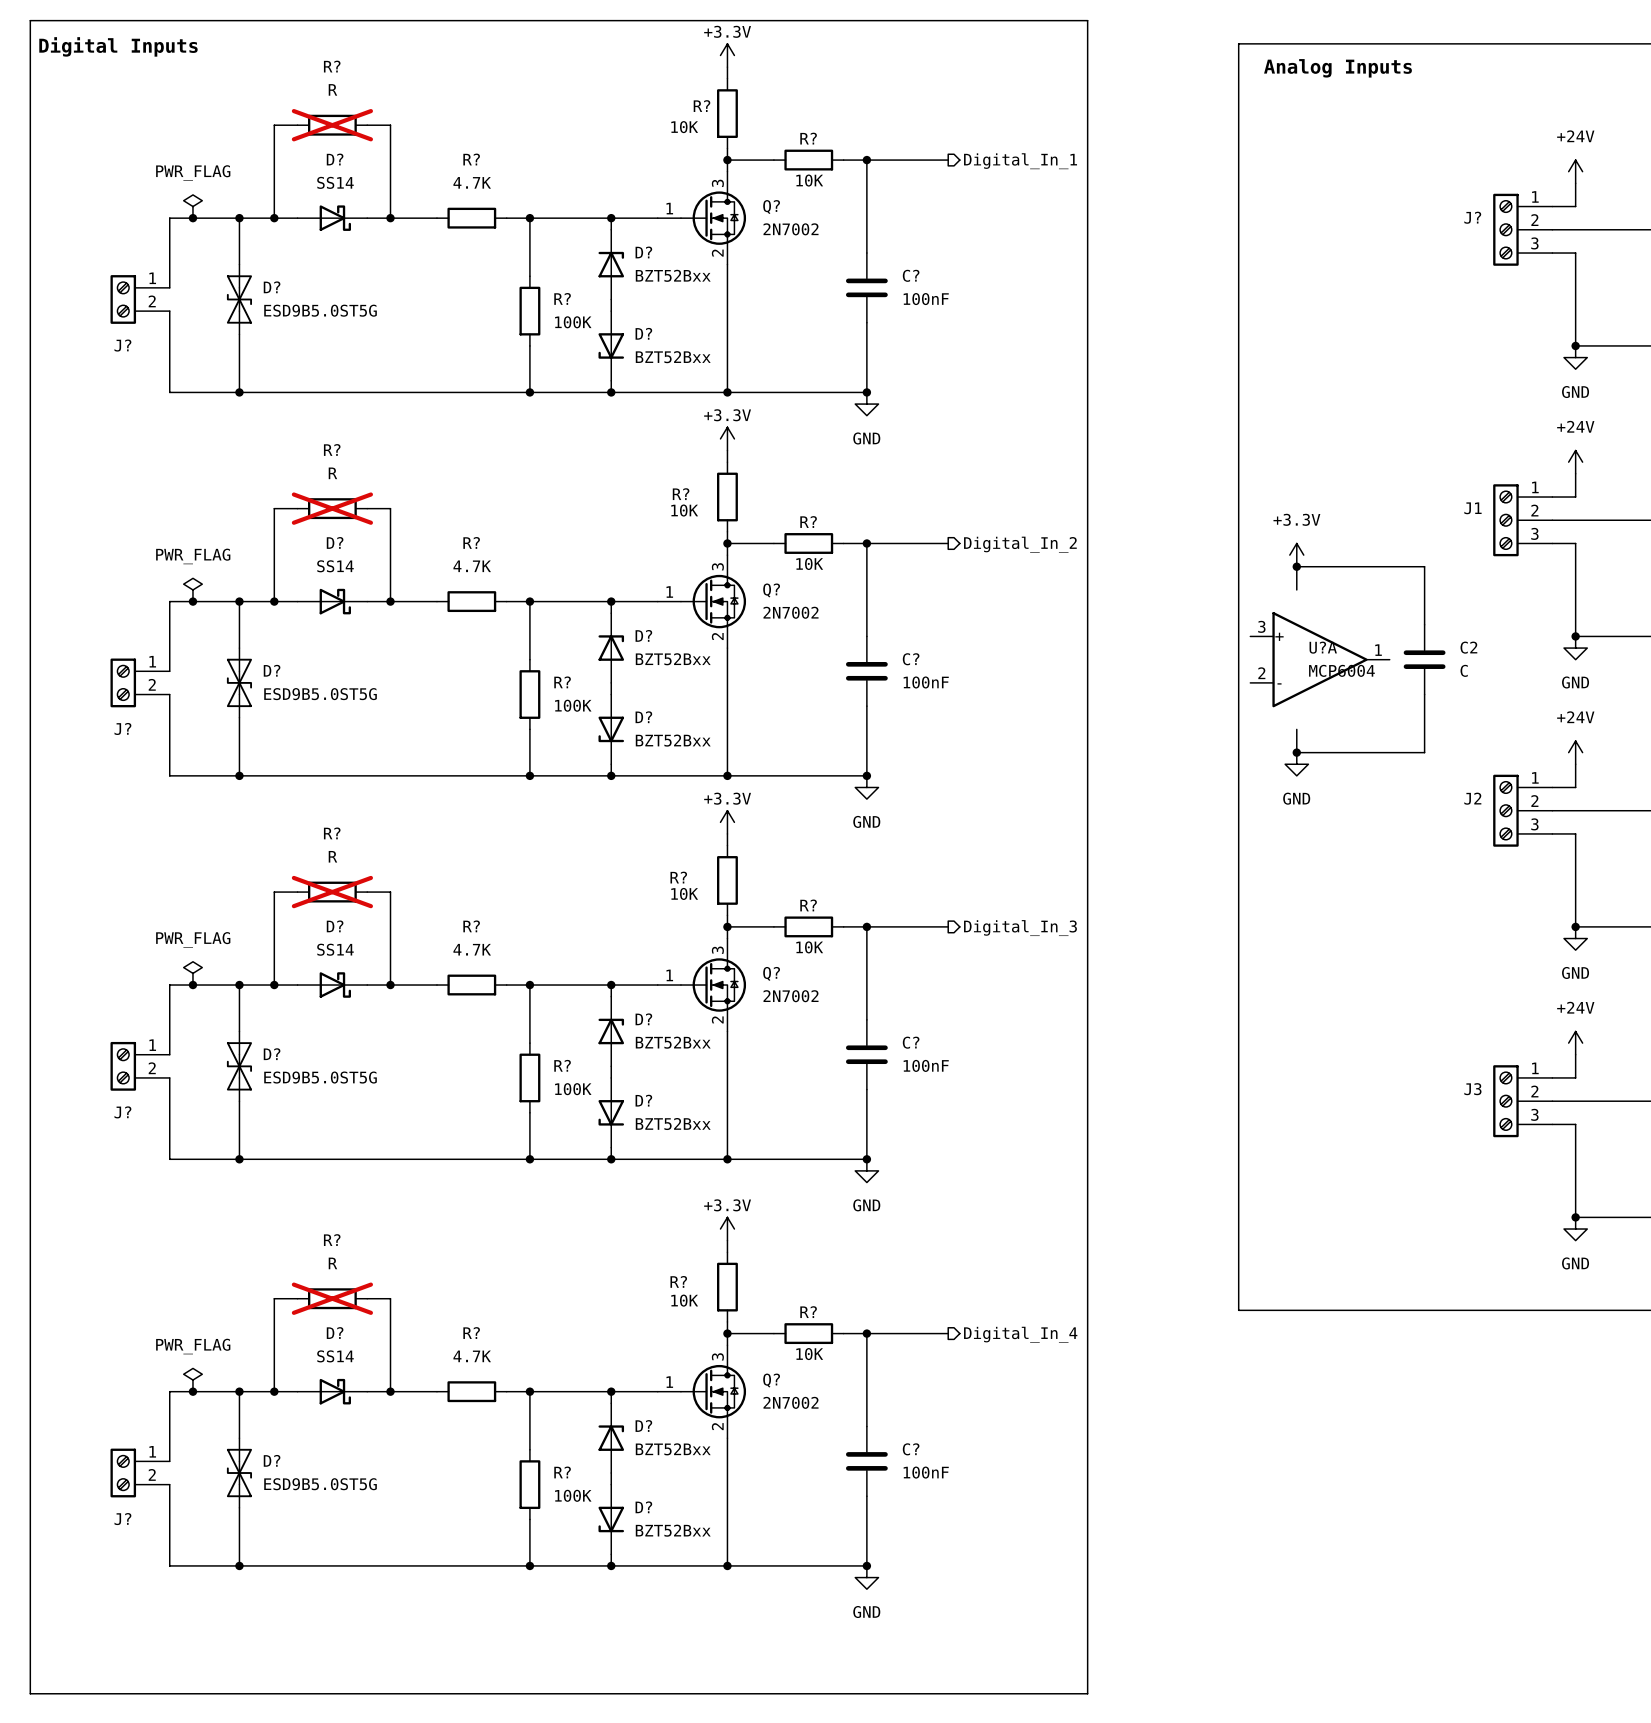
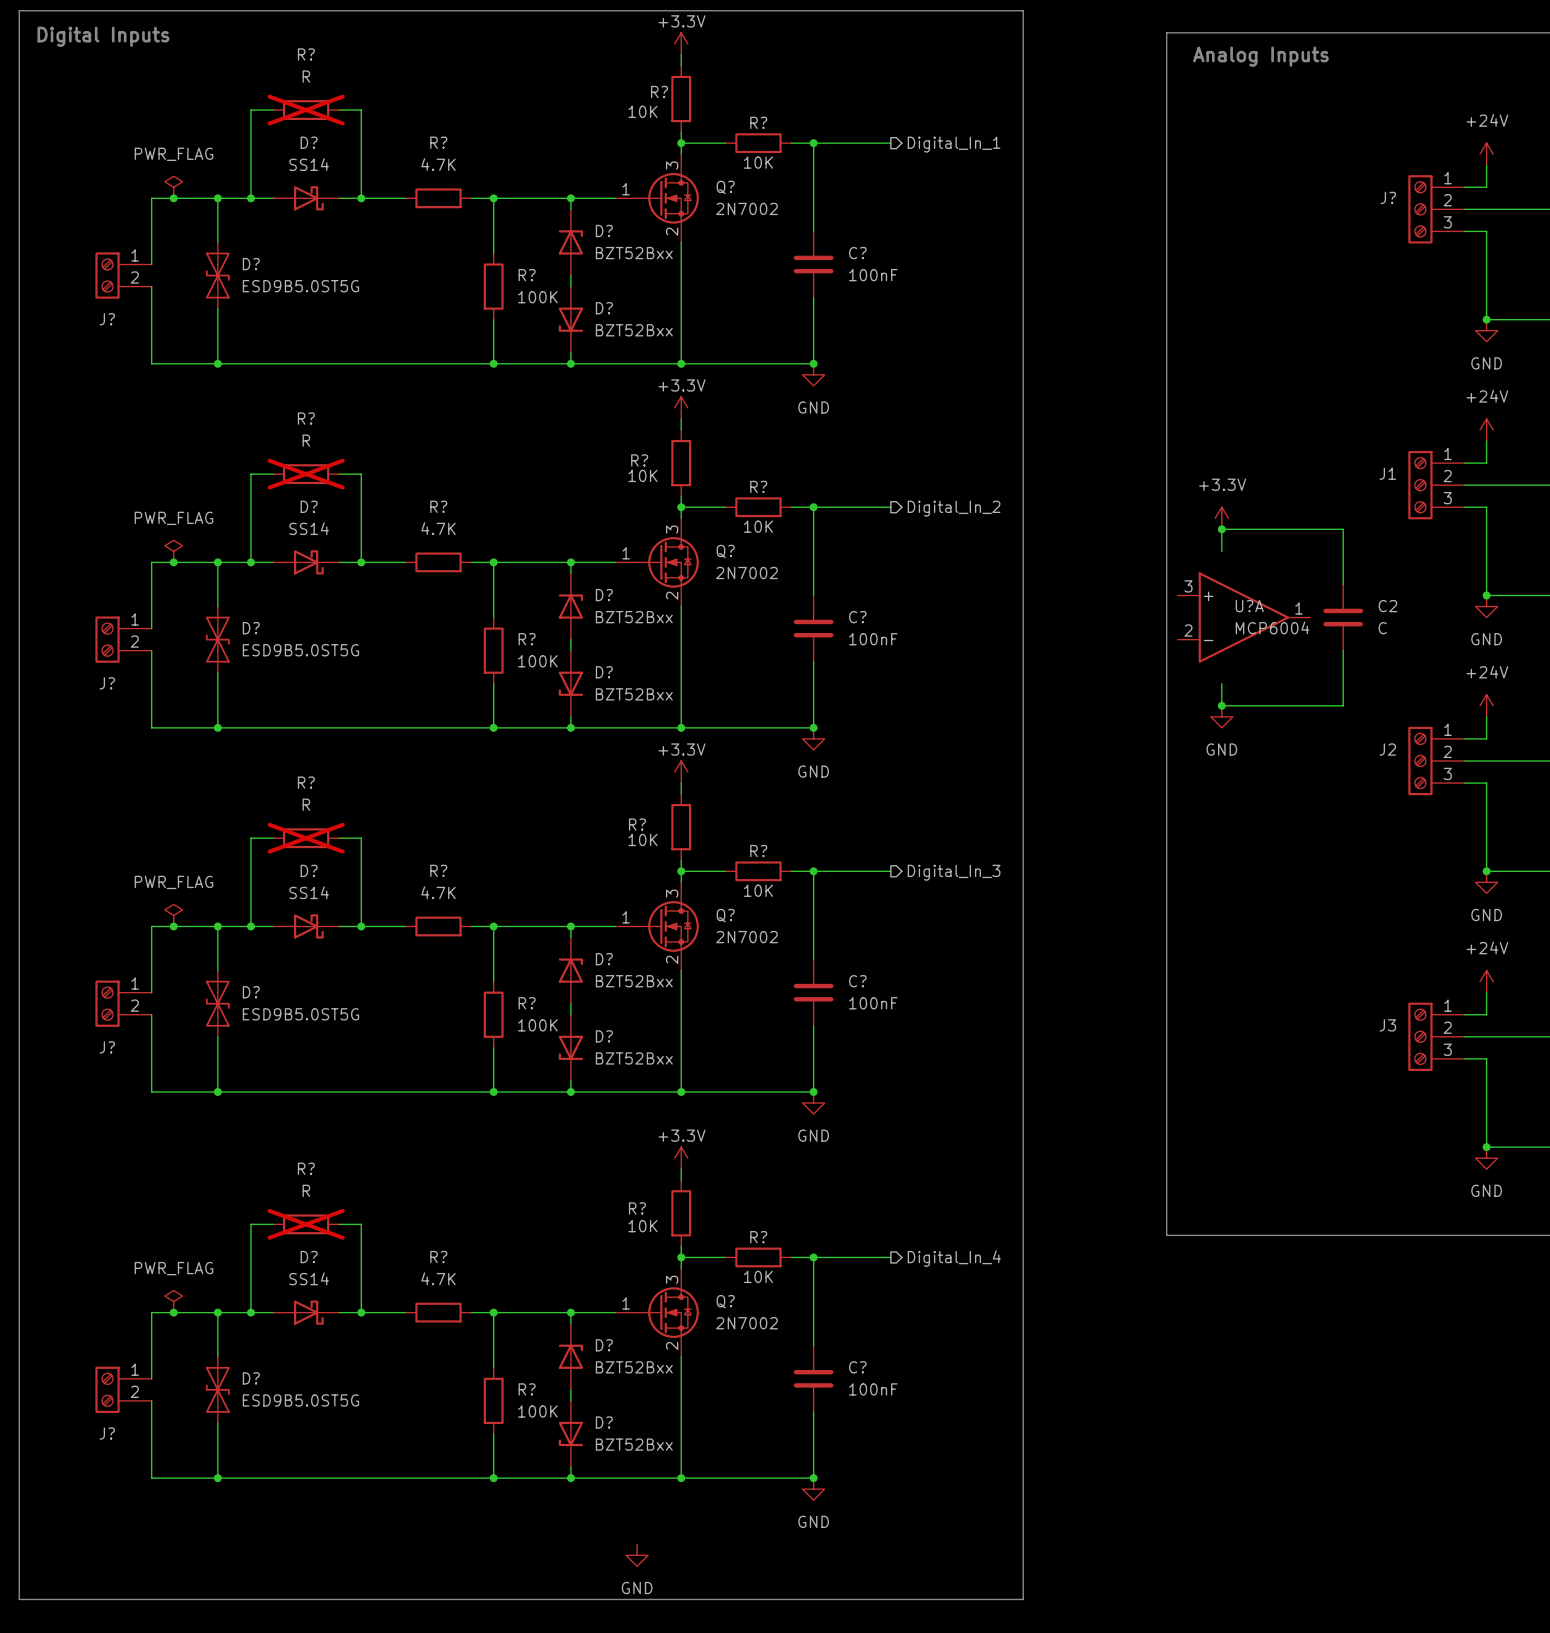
power symbol: none -> GND (637, 1555)

